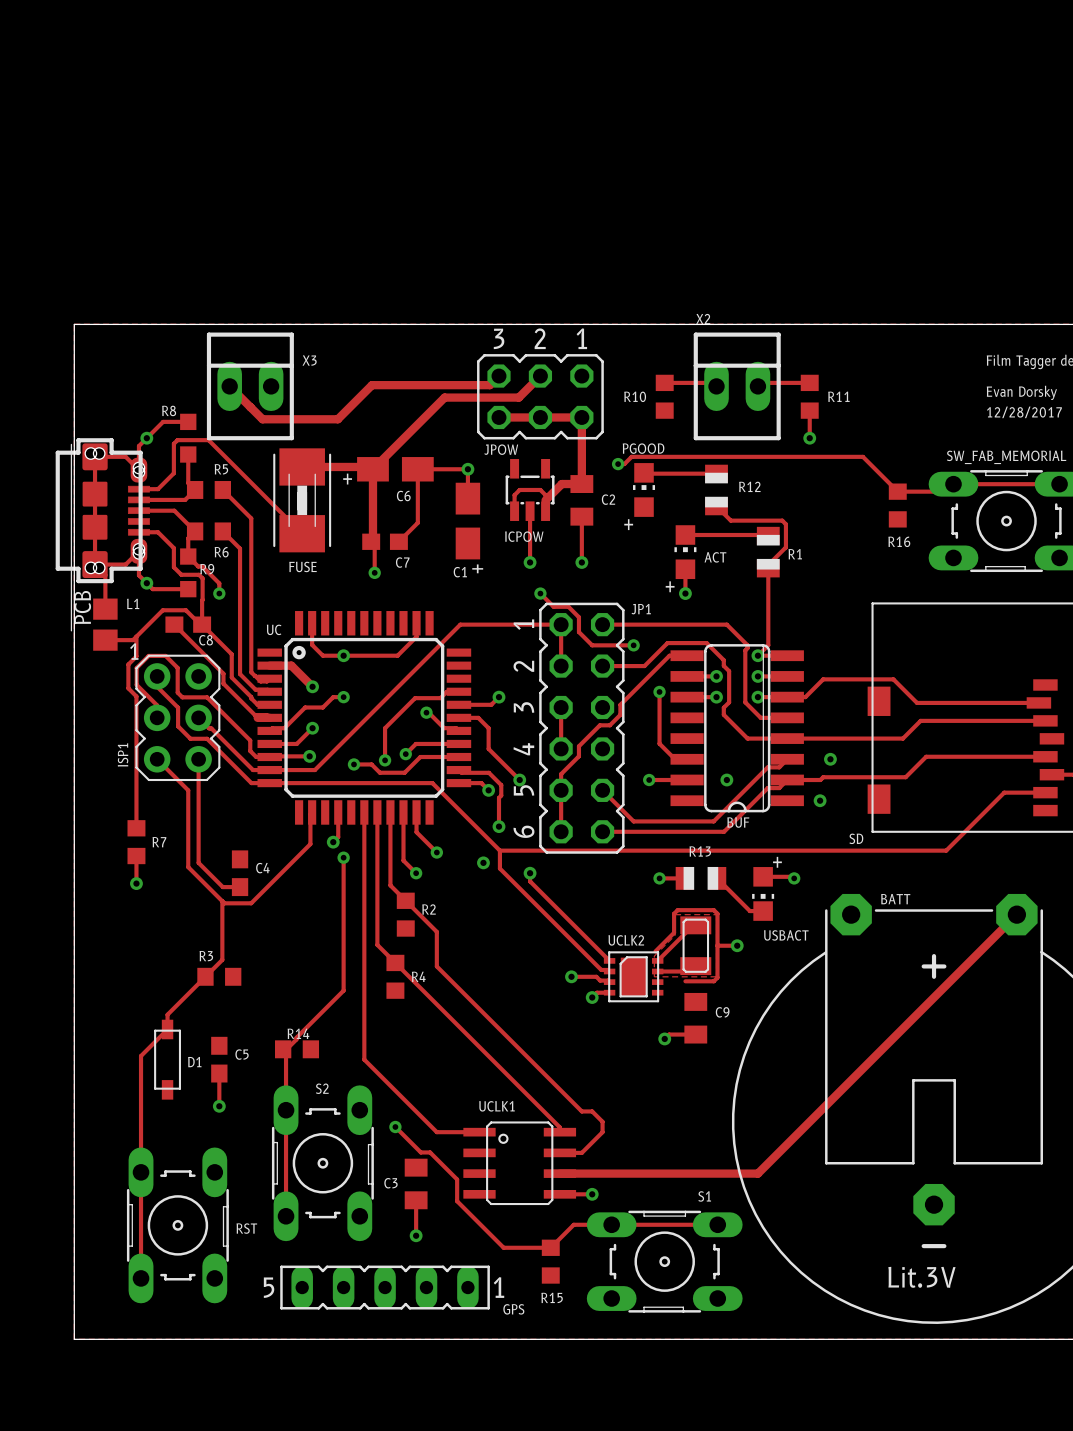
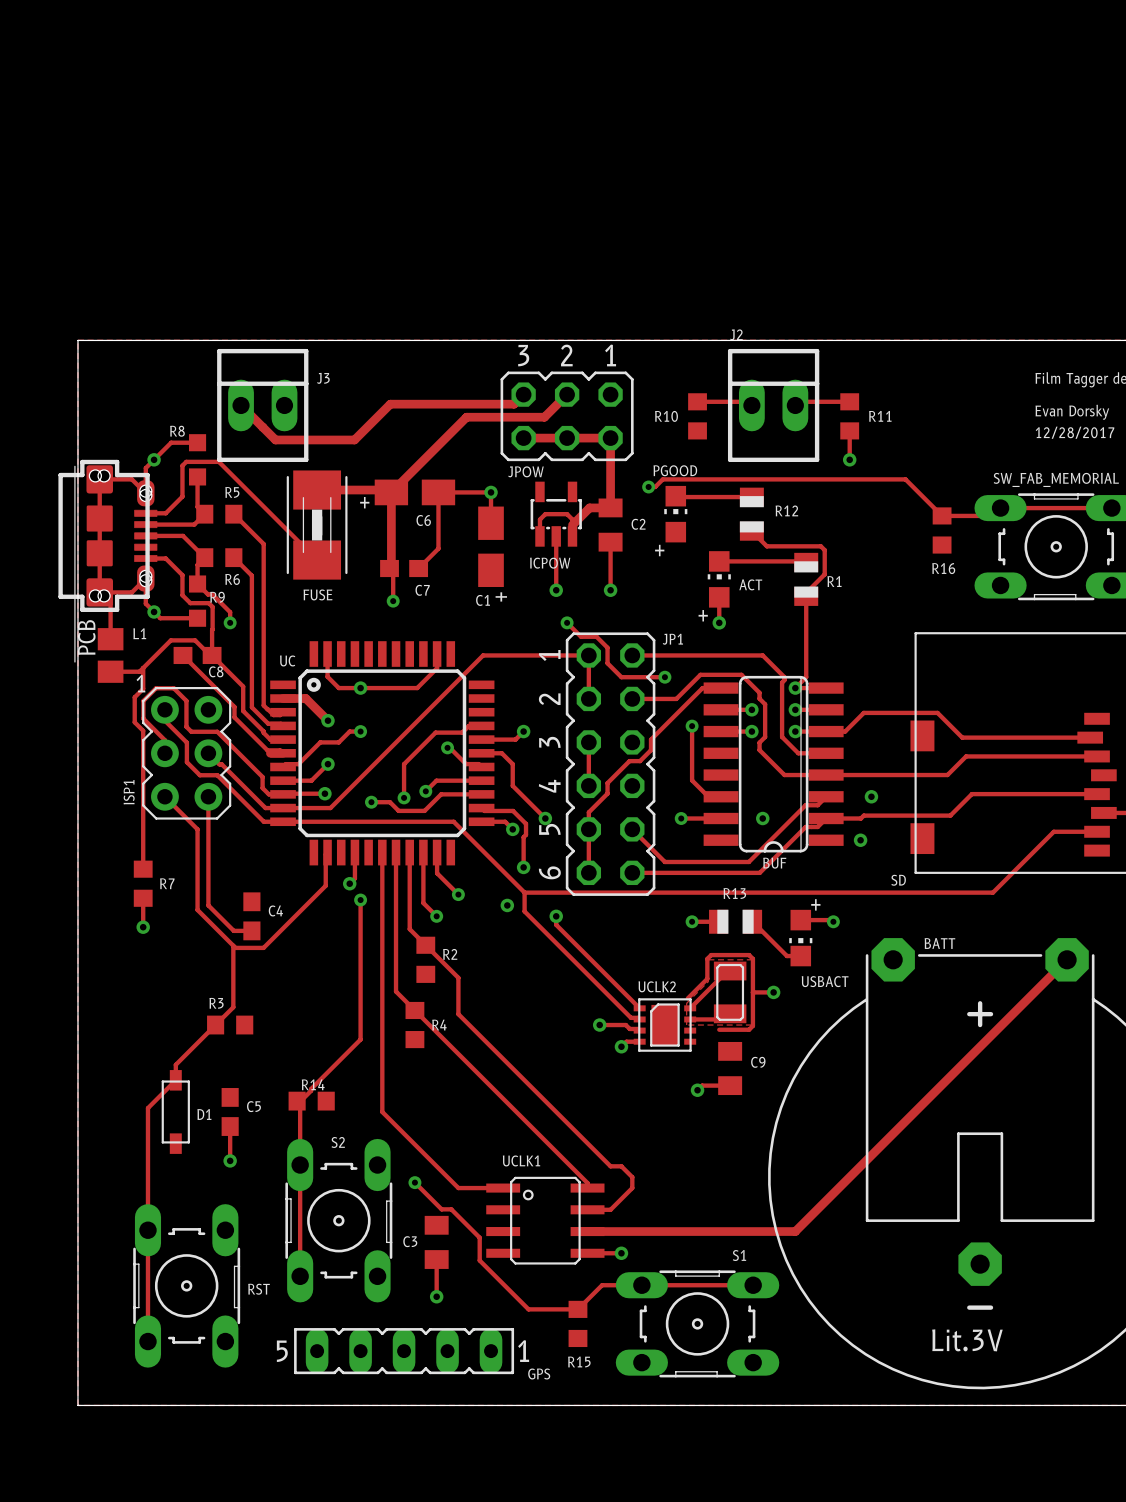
X2 name: X2 (703, 319) -> J2 (736, 334)
X3 name: X3 (309, 360) -> J3 (323, 378)

